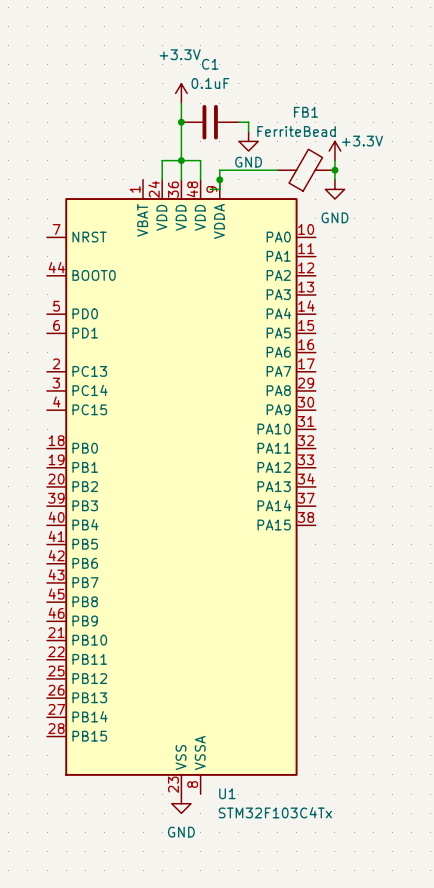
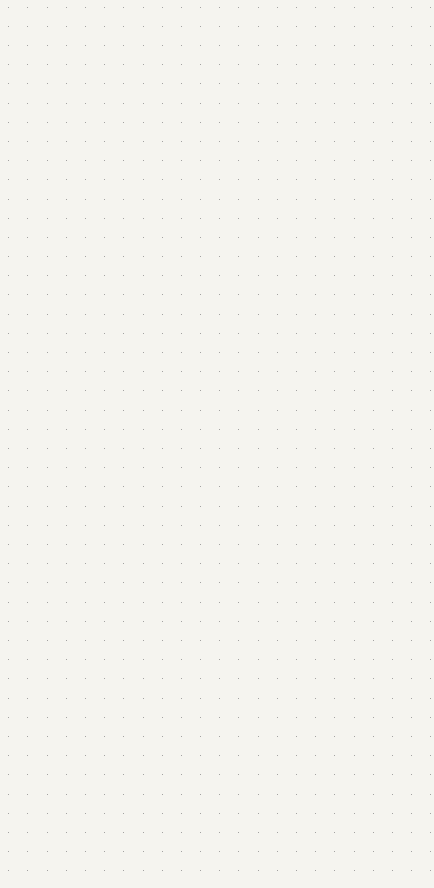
power symbol: +3.3V (181, 93) -> none
wire: (181, 103) (181, 179) -> none
junction: (181, 122) -> none
C1: 0.1uF (210, 122) -> none
wire: (238, 122) (248, 122) (248, 131) -> none
power symbol: GND (248, 141) -> none
power symbol: +3.3V (334, 151) -> none
junction: (181, 160) -> none
wire: (334, 160) (334, 179) -> none
wire: (277, 170) (219, 170) (219, 189) (210, 189) -> none
FB1: FerriteBead (306, 170) -> none
junction: (334, 170) -> none
wire: (162, 179) (162, 160) (200, 160) (200, 179) -> none
junction: (219, 179) -> none
power symbol: GND (334, 189) -> none
U1: STM32F103C4Tx (181, 486) -> none
power symbol: GND (181, 803) -> none

